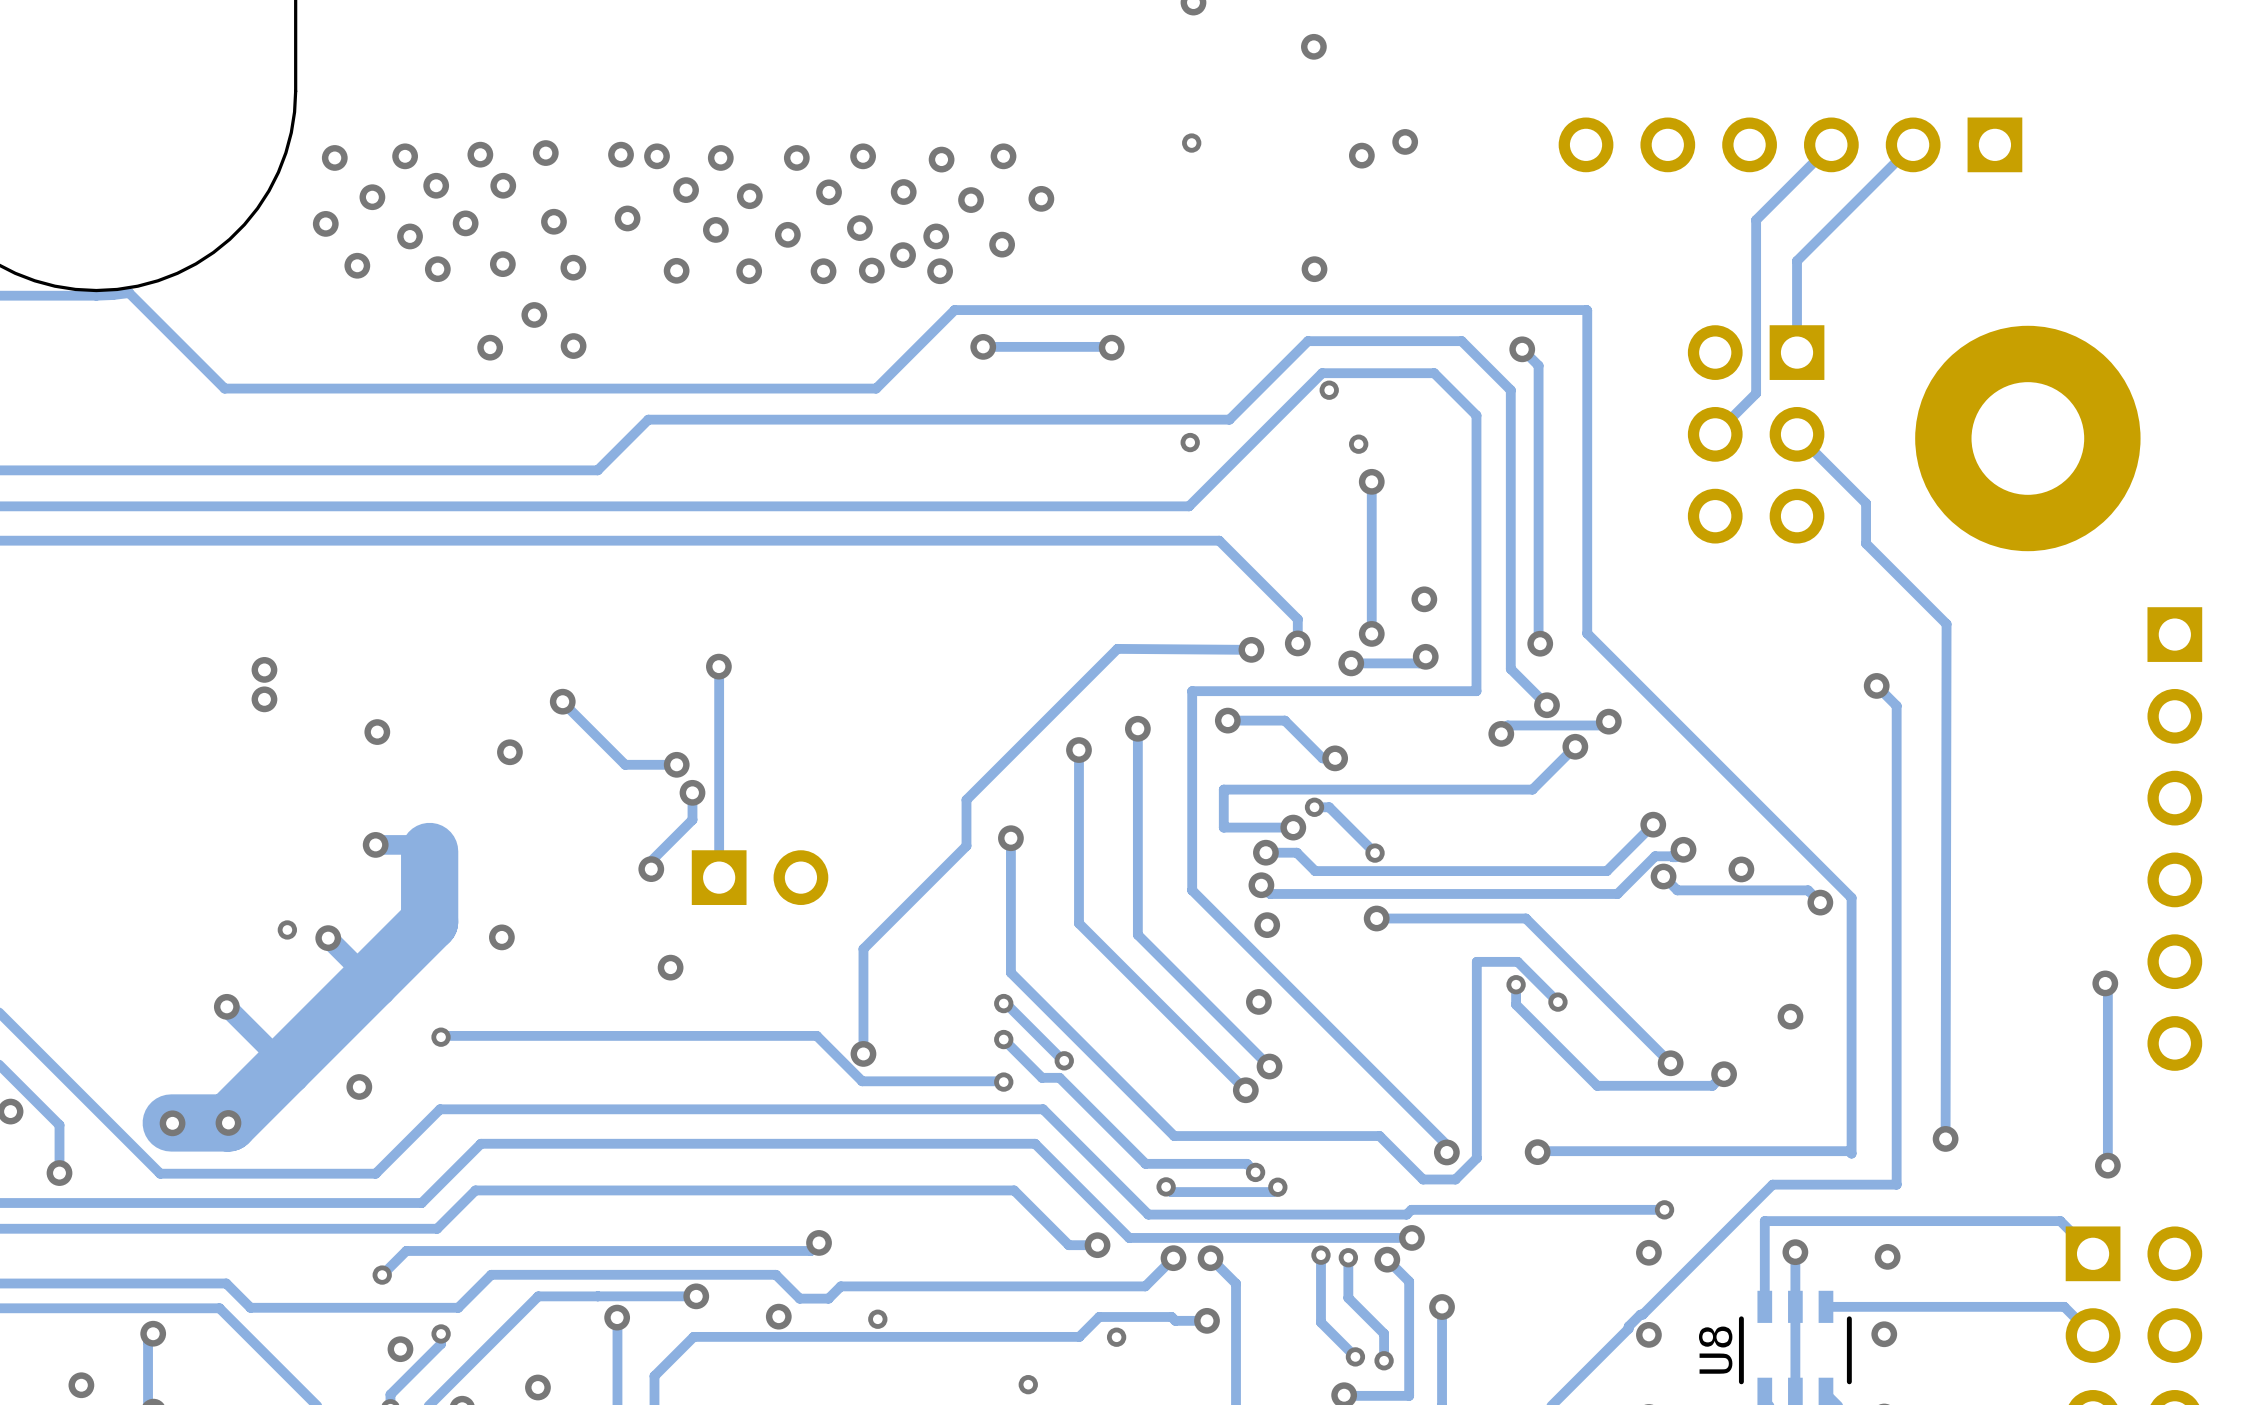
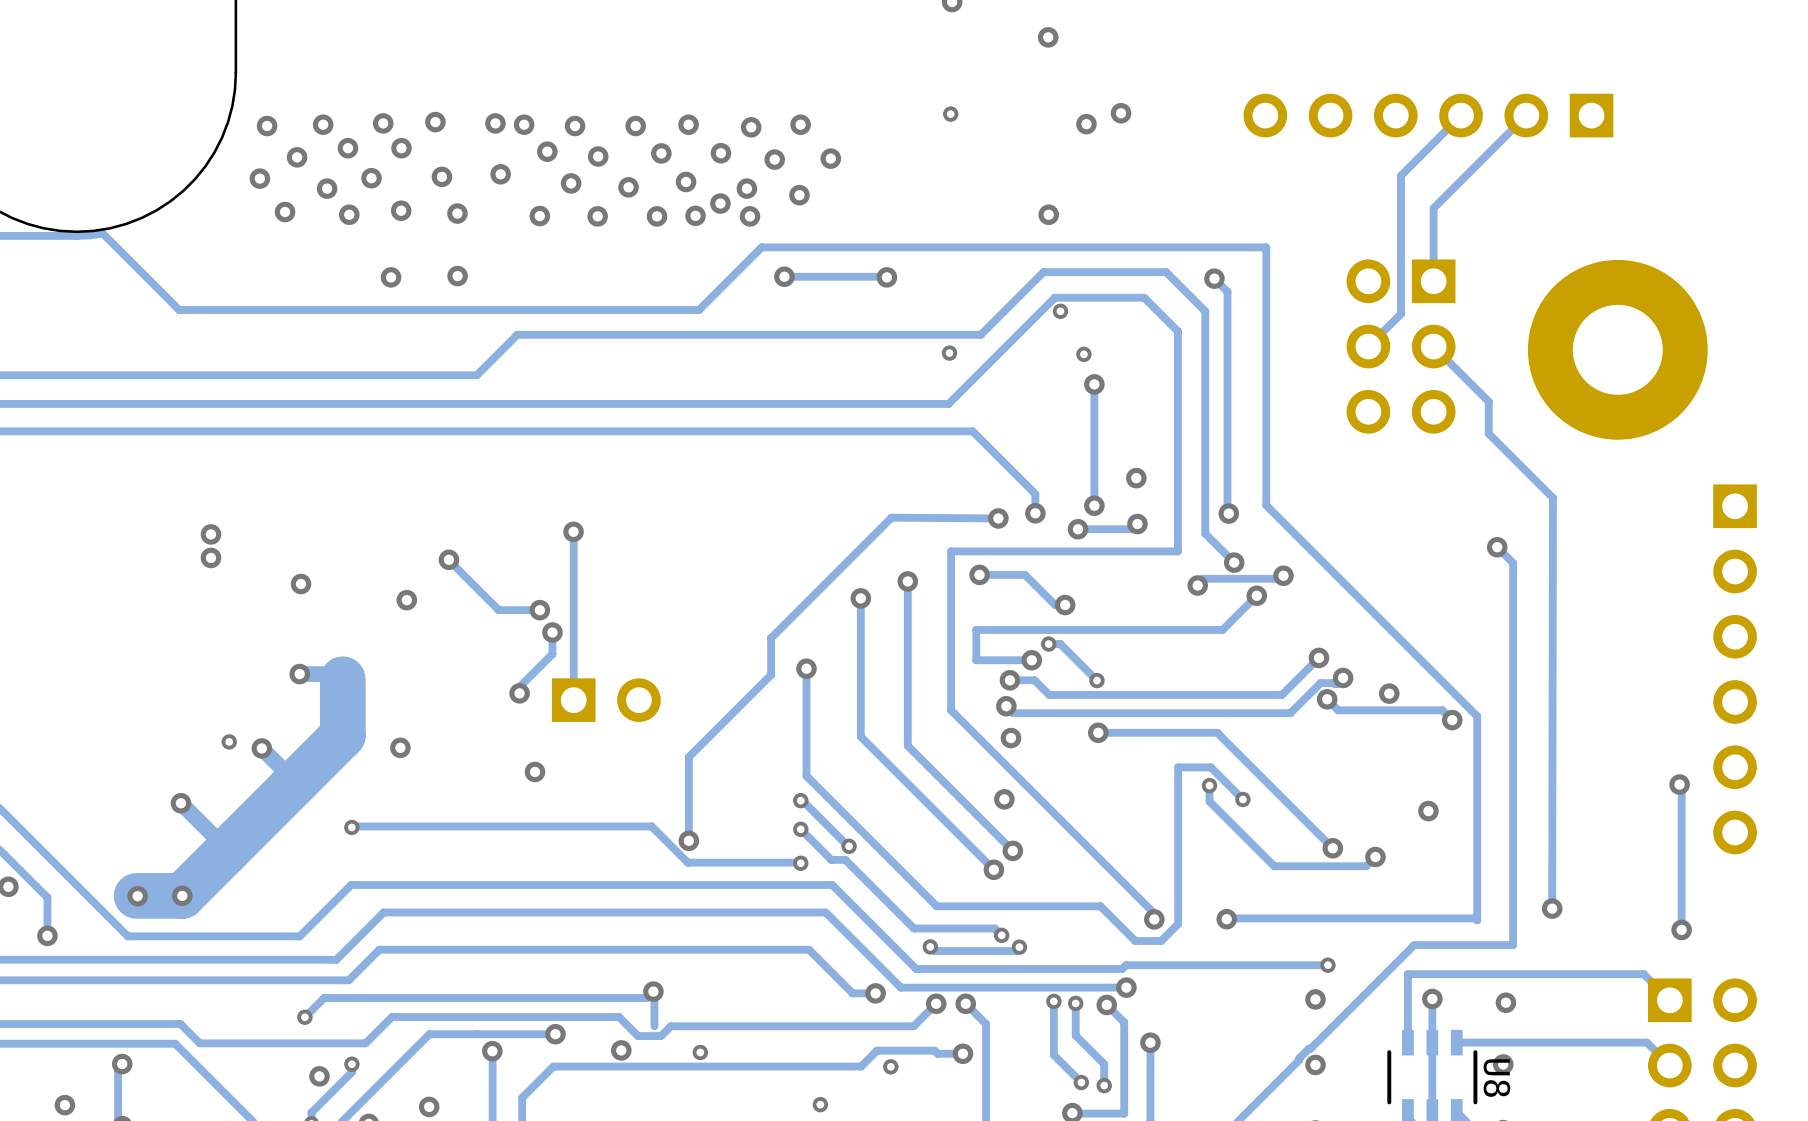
via: (534, 314) -> none
via: (359, 1086) -> none
track: none -> (654, 992) (654, 1026)
U8 name rotation: 0° (1715, 1350) -> 180° (1496, 1078)
U8 name position: U8 (1715, 1350) -> U8 (1496, 1078)

